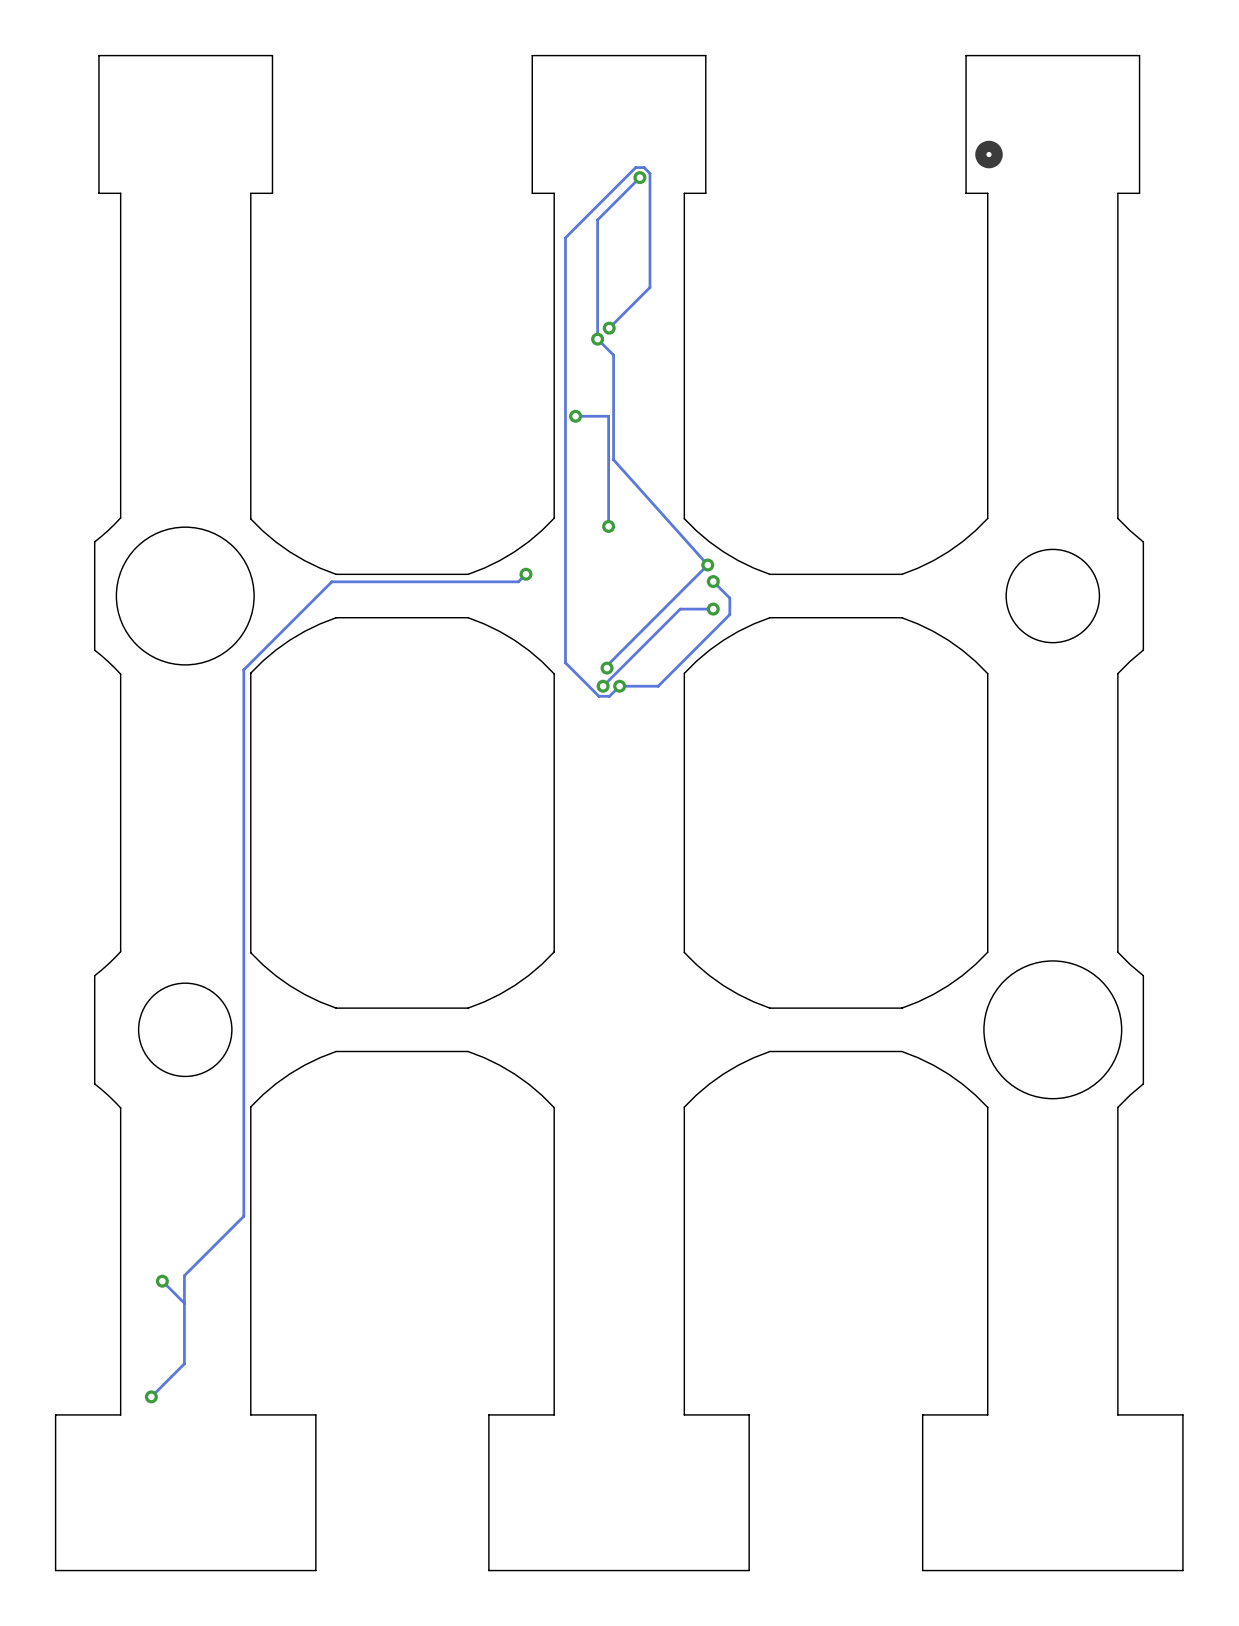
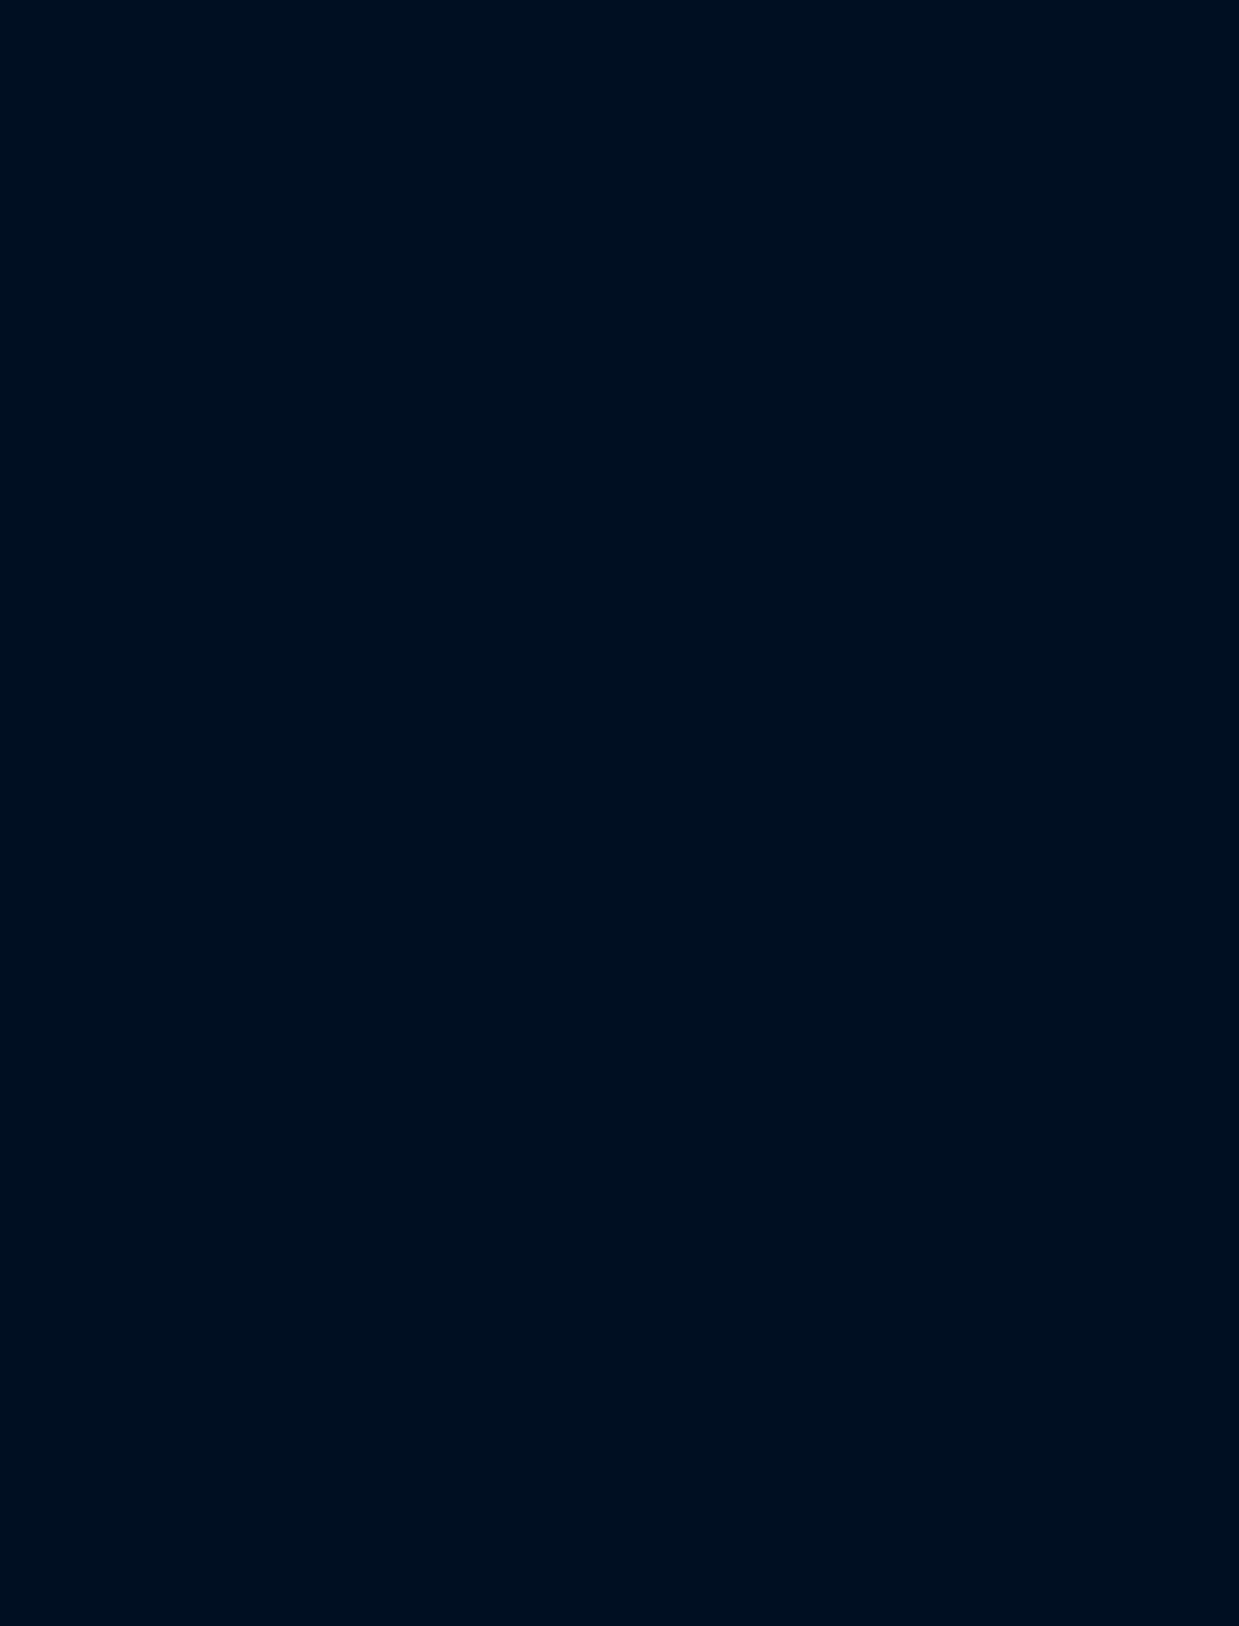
board edge: (1139, 55) (966, 55) (966, 193) (987, 193) (987, 518) (948, 551) (901, 574) (769, 574) (723, 551) (684, 518) (684, 193) (705, 193) (705, 55) (532, 55) (532, 193) (554, 193) (554, 518) (514, 551) (468, 574) (336, 574) (290, 552) (250, 518) (250, 193) (272, 193) (272, 55) (98, 55) (98, 193) (120, 193) (120, 517) (94, 541) (94, 650) (120, 674) (120, 951) (94, 975) (94, 1083) (120, 1107) (120, 1414) (55, 1414) (55, 1570) (315, 1570) (315, 1414) (250, 1414) (250, 1106) (290, 1073) (336, 1051) (468, 1051) (514, 1074) (554, 1107) (554, 1414) (488, 1414) (488, 1570) (749, 1570) (749, 1414) (684, 1414) (684, 1107) (723, 1073) (769, 1051) (901, 1051) (948, 1074) (987, 1107) (987, 1414) (922, 1414) (922, 1570) (1182, 1570) (1182, 1414) (1117, 1414) (1117, 1107) (1143, 1083) (1143, 975) (1117, 952) (1117, 673) (1143, 650) (1143, 541) (1117, 518) (1117, 193) (1139, 193) (1139, 55) -> none
part: (989, 154) -> none
track: (639, 177) (597, 219) (597, 339) (613, 355) (613, 459) (707, 565) (607, 665) (607, 668) -> none
via: (639, 177) -> none
track: (609, 328) (649, 287) (649, 173) (644, 167) (635, 167) (565, 237) (565, 662) (598, 696) (609, 696) (619, 686) (658, 686) (729, 614) (729, 598) (713, 581) -> none
via: (609, 328) -> none
via: (597, 339) -> none
track: (575, 416) (608, 416) (608, 526) -> none
via: (575, 416) -> none
round board edge: [115, 526, 255, 666] -> none
via: (608, 526) -> none
round board edge: [1005, 548, 1100, 644] -> none
via: (707, 565) -> none
track: (525, 574) (518, 581) (331, 581) (243, 669) (243, 1216) (184, 1275) (184, 1363) (151, 1396) -> none
via: (525, 574) -> none
via: (713, 581) -> none
track: (713, 609) (680, 609) (603, 686) -> none
via: (713, 609) -> none
board edge: (468, 617) (336, 617) (290, 640) (250, 673) (250, 952) (290, 985) (336, 1008) (468, 1008) (514, 985) (554, 951) (554, 673) (514, 640) (468, 617) -> none
board edge: (901, 617) (769, 617) (723, 640) (684, 673) (684, 952) (723, 985) (769, 1008) (901, 1008) (948, 985) (987, 952) (987, 673) (948, 640) (901, 617) -> none
via: (607, 668) -> none
via: (603, 686) -> none
via: (619, 686) -> none
round board edge: [983, 960, 1123, 1100] -> none
round board edge: [138, 982, 233, 1077] -> none
track: (162, 1281) (184, 1303) -> none
via: (162, 1281) -> none
via: (151, 1396) -> none

